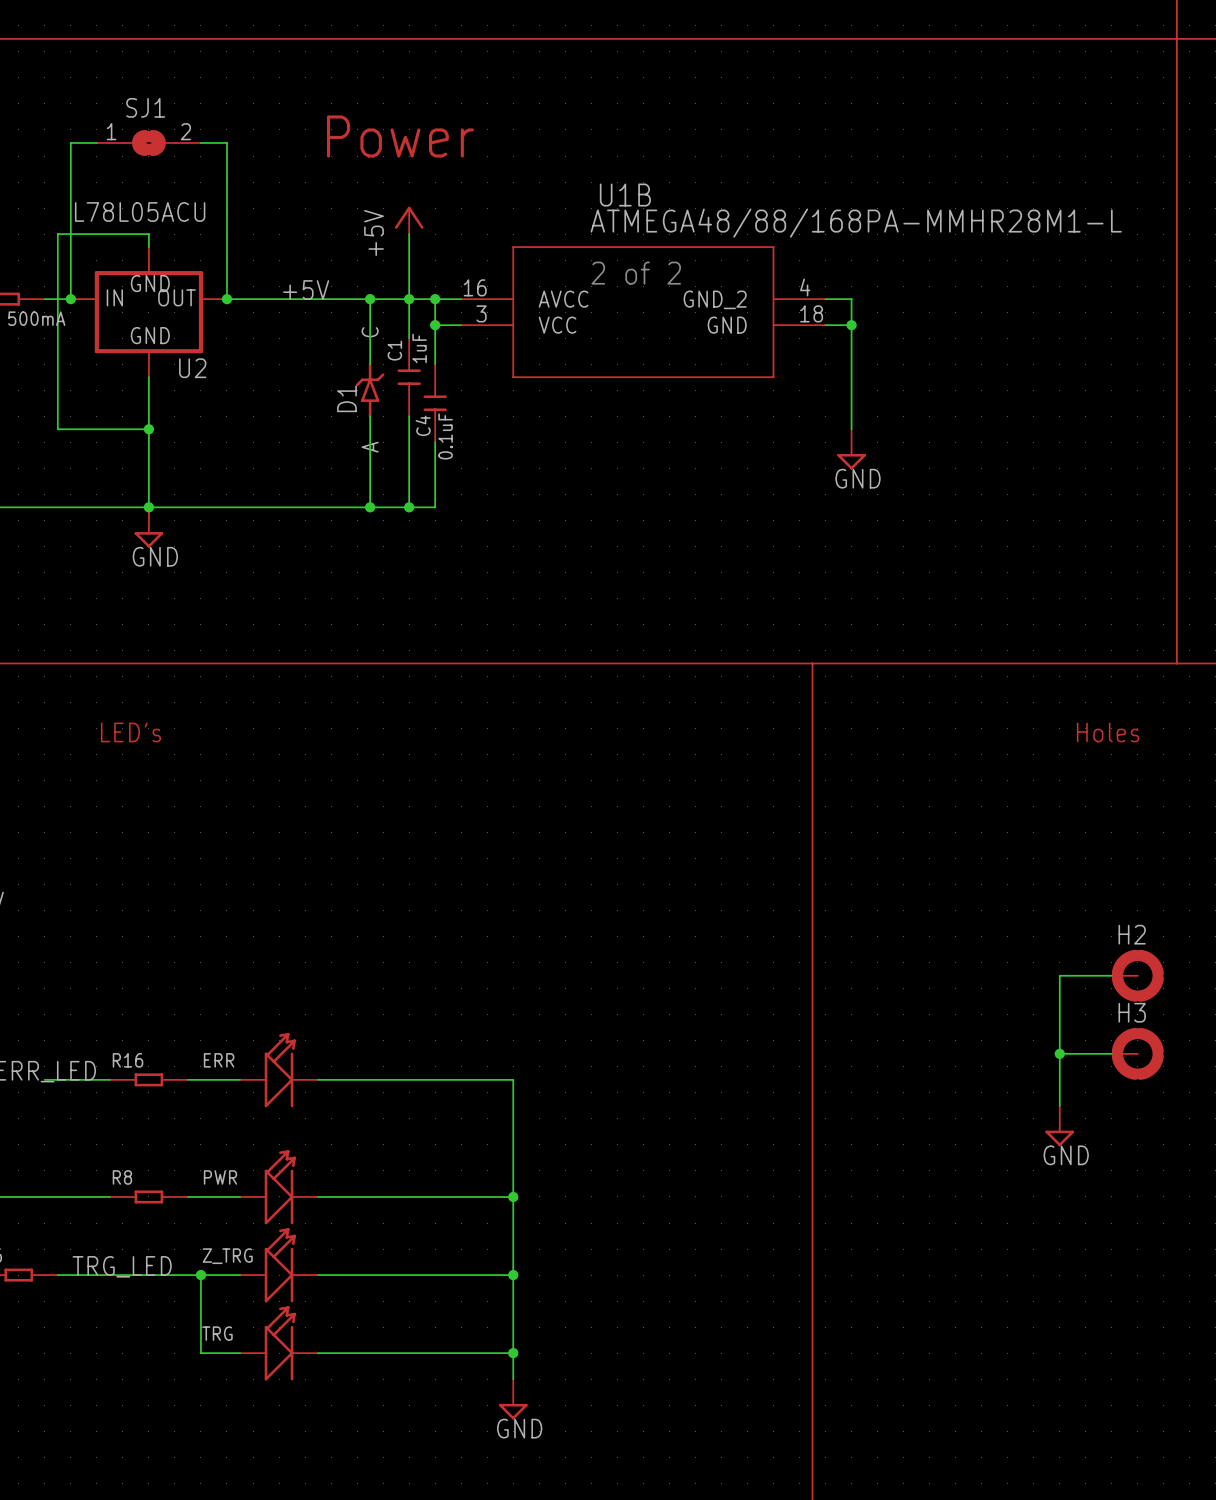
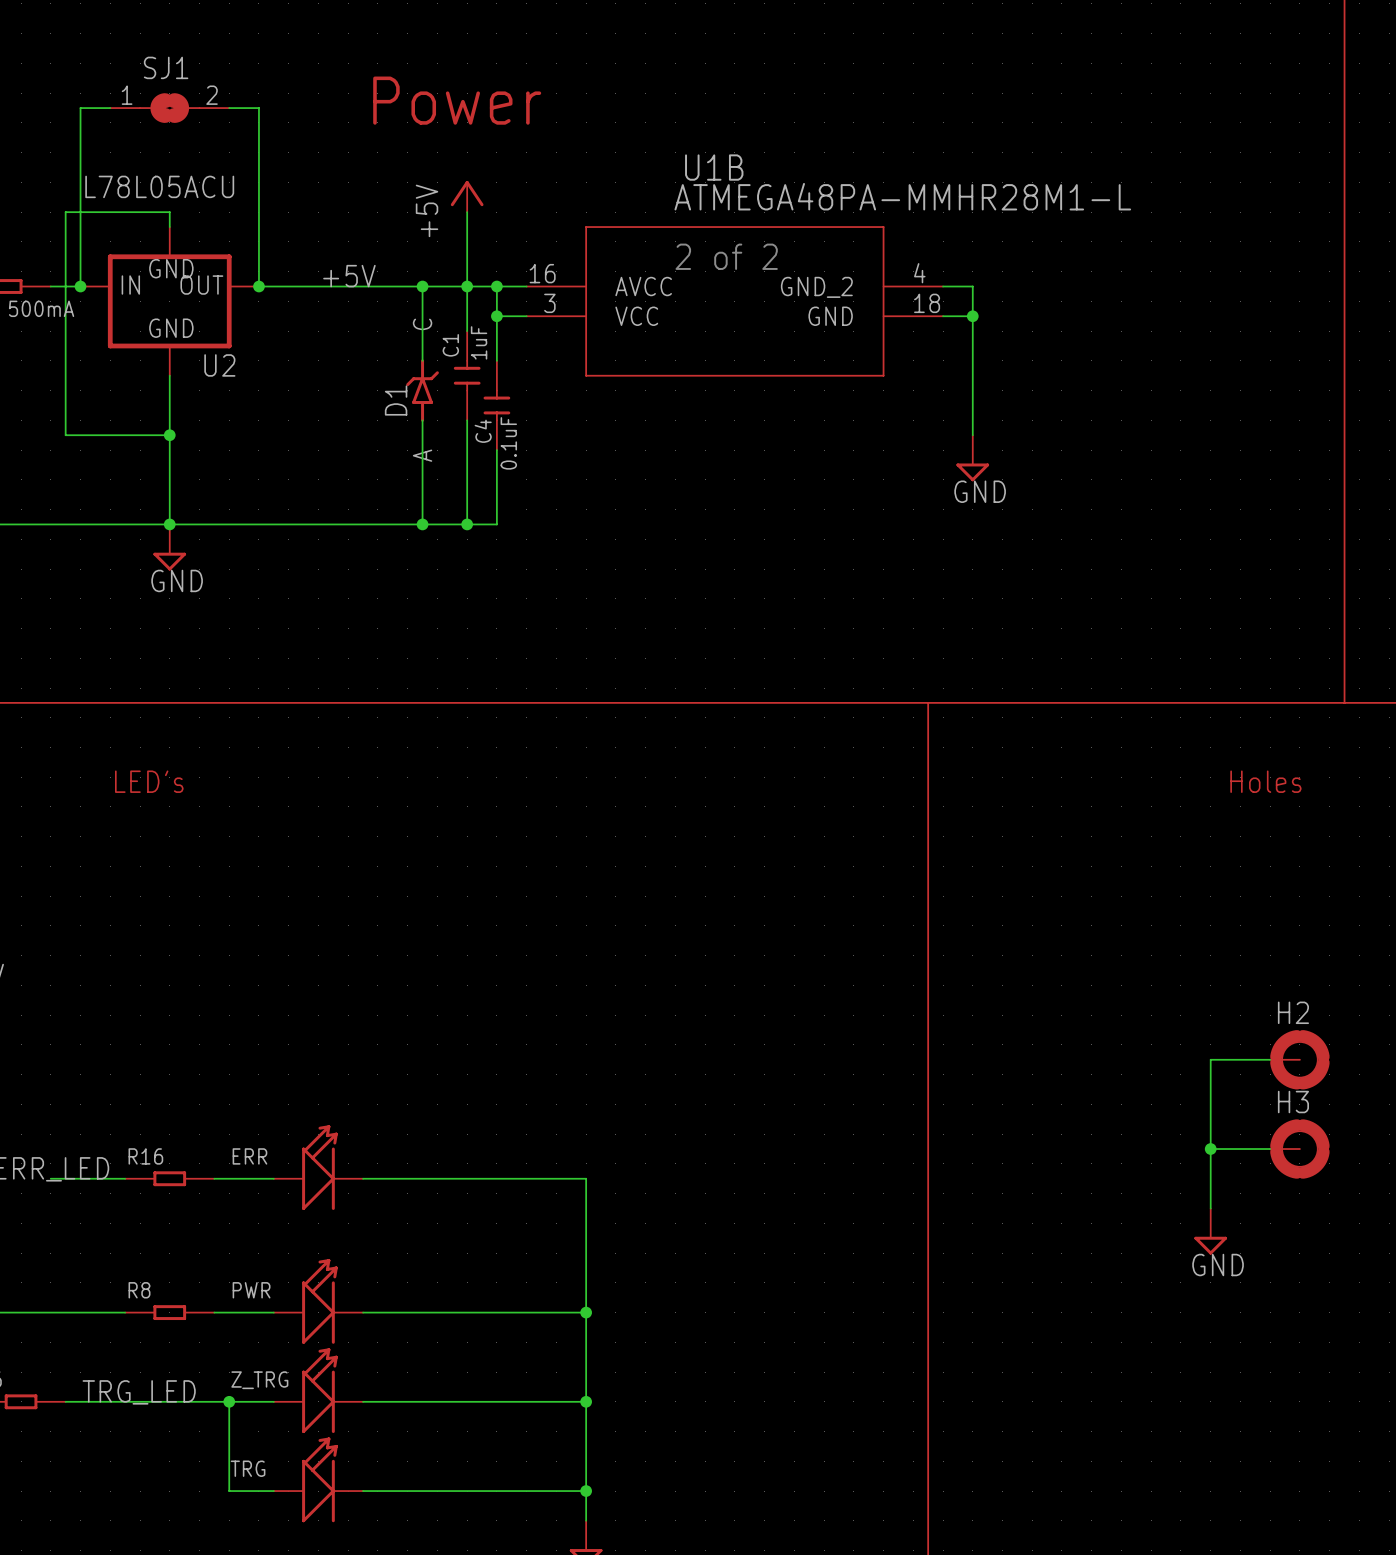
U1B value: ATMEGA48/88/168PA-MMHR28M1-L (856, 223) -> ATMEGA48PA-MMHR28M1-L (902, 196)

